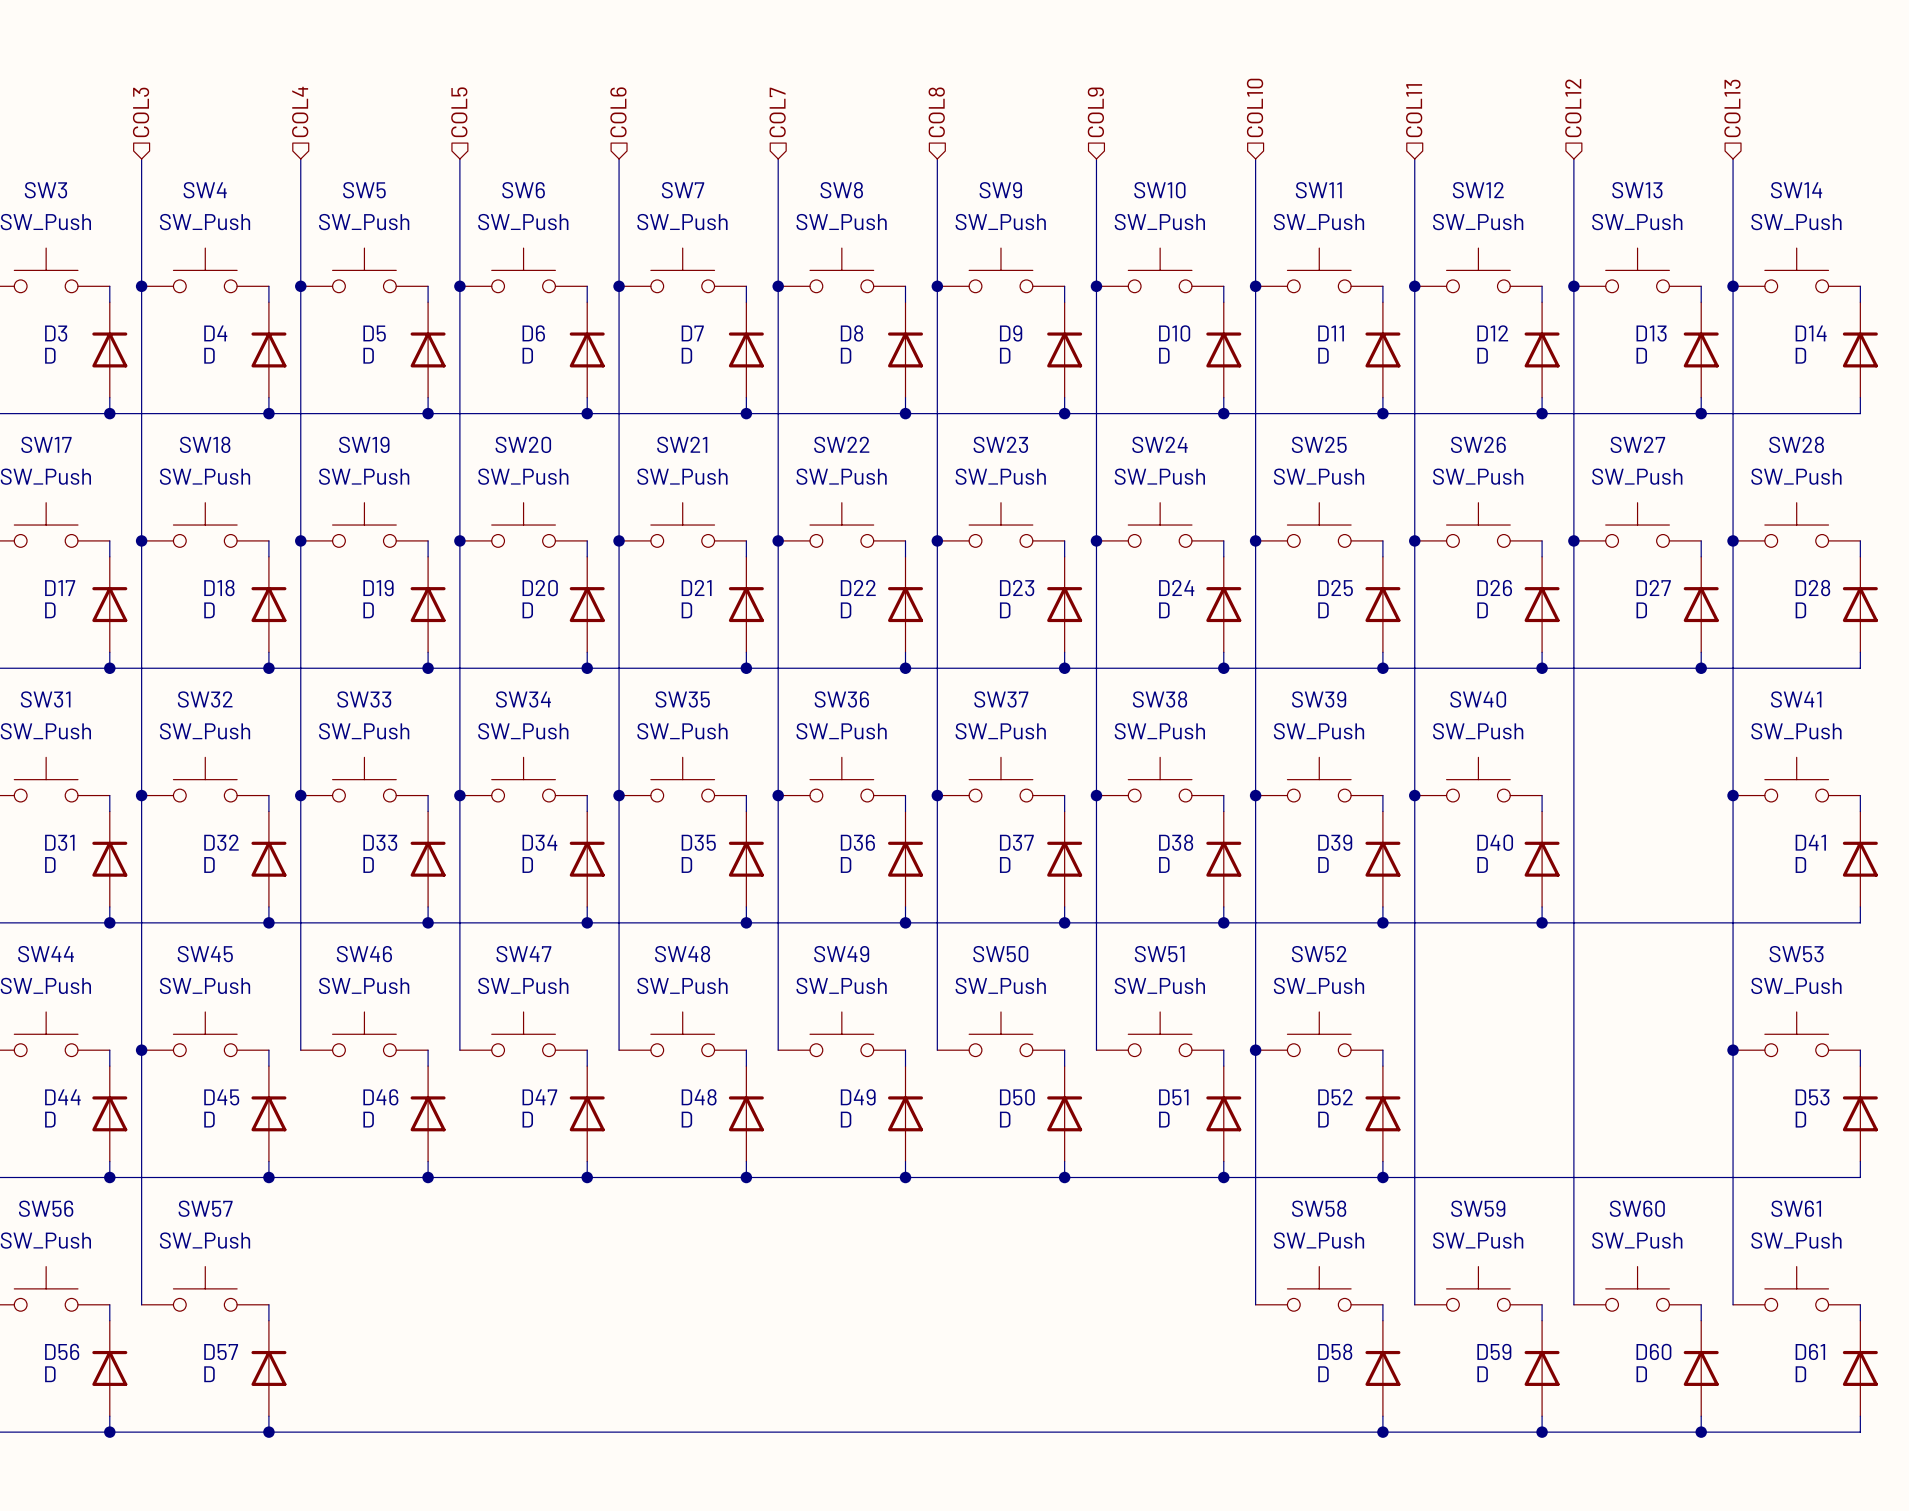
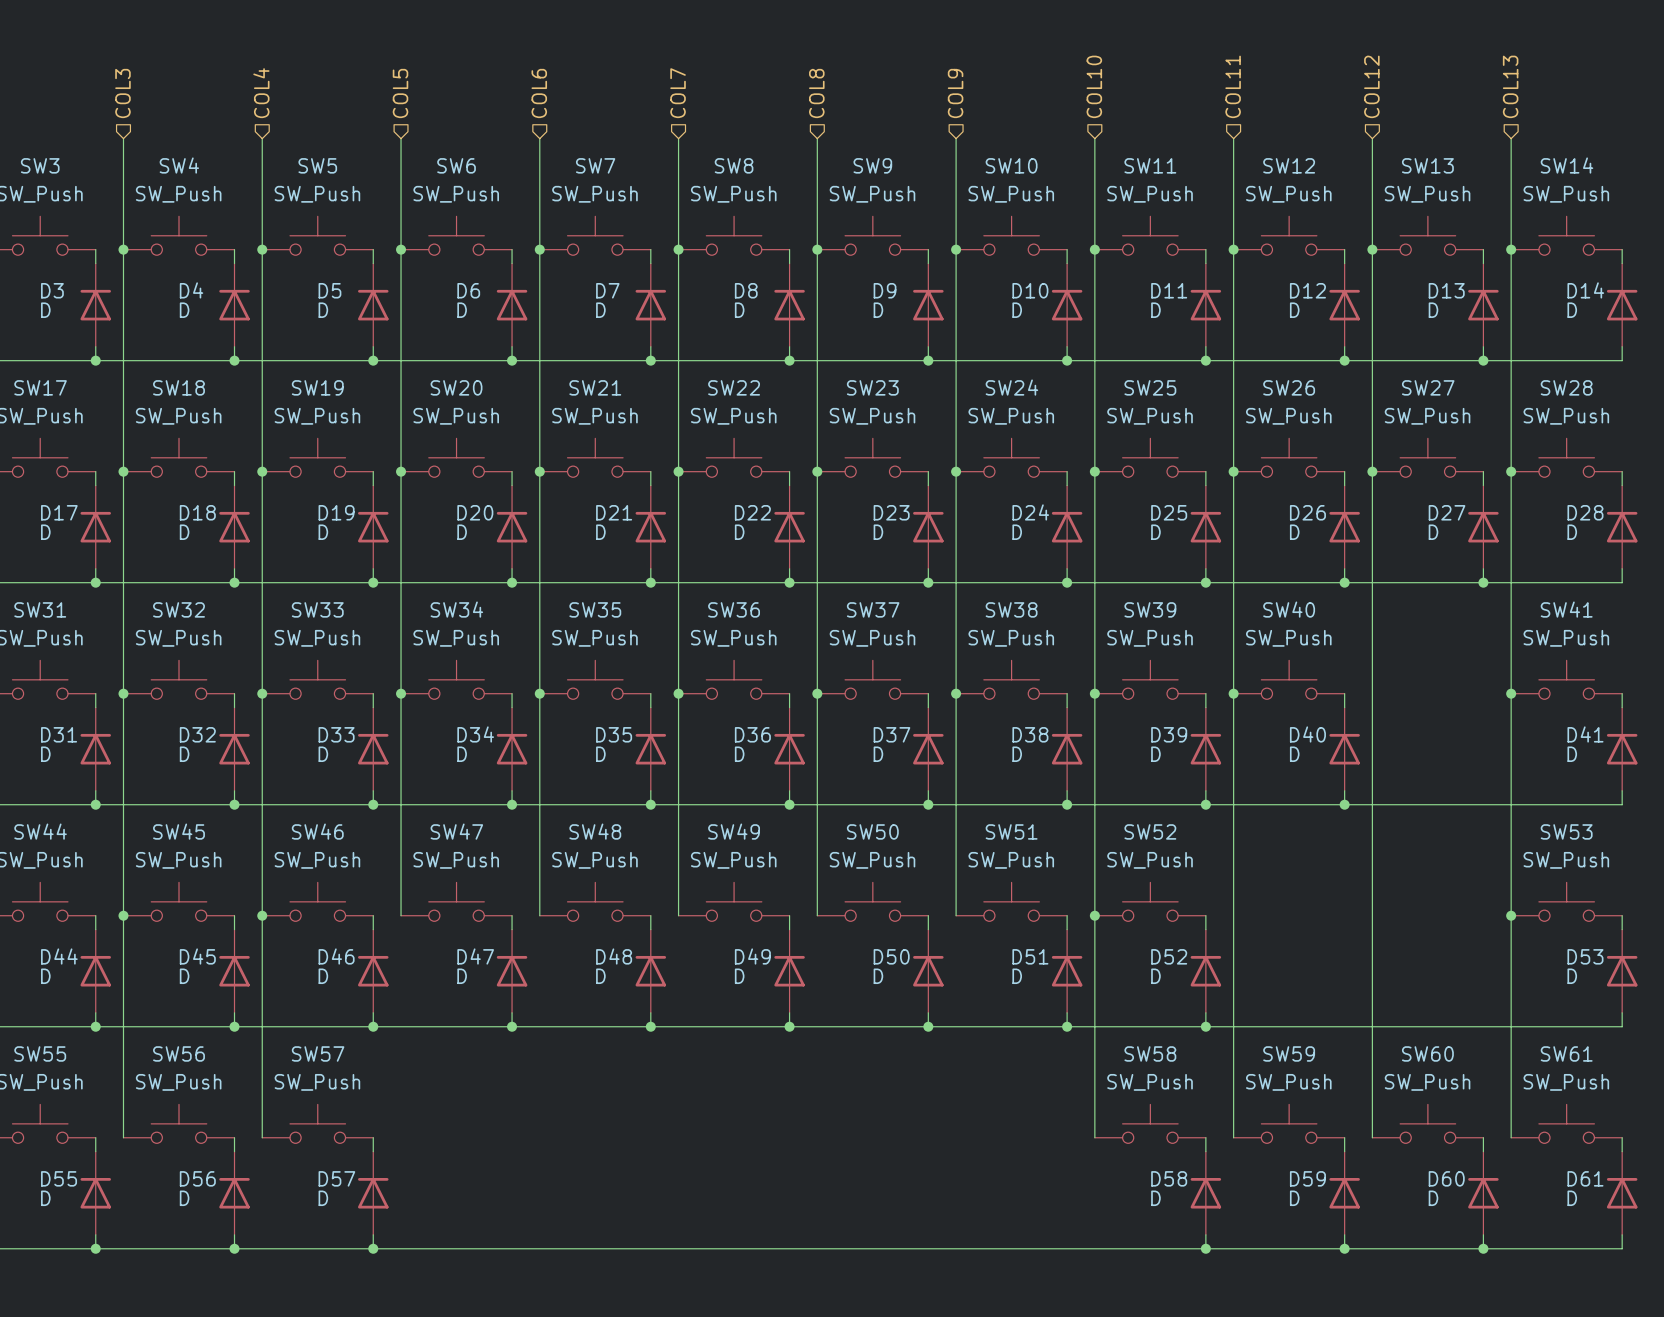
wire: none -> (262, 915) (262, 1137)
junction: none -> (262, 915)
SW56 name: SW56 (46, 1208) -> SW55 (40, 1053)
SW57 name: SW57 (205, 1208) -> SW56 (178, 1053)
SW57: none -> SW_Push (317, 1123)
wire: none -> (373, 1137) (373, 1151)
D56 name: D56 (62, 1351) -> D55 (59, 1178)
D57 name: D57 (221, 1352) -> D56 (197, 1178)
D57: none -> D (373, 1193)
wire: none -> (373, 1234) (373, 1248)
junction: none -> (373, 1248)

